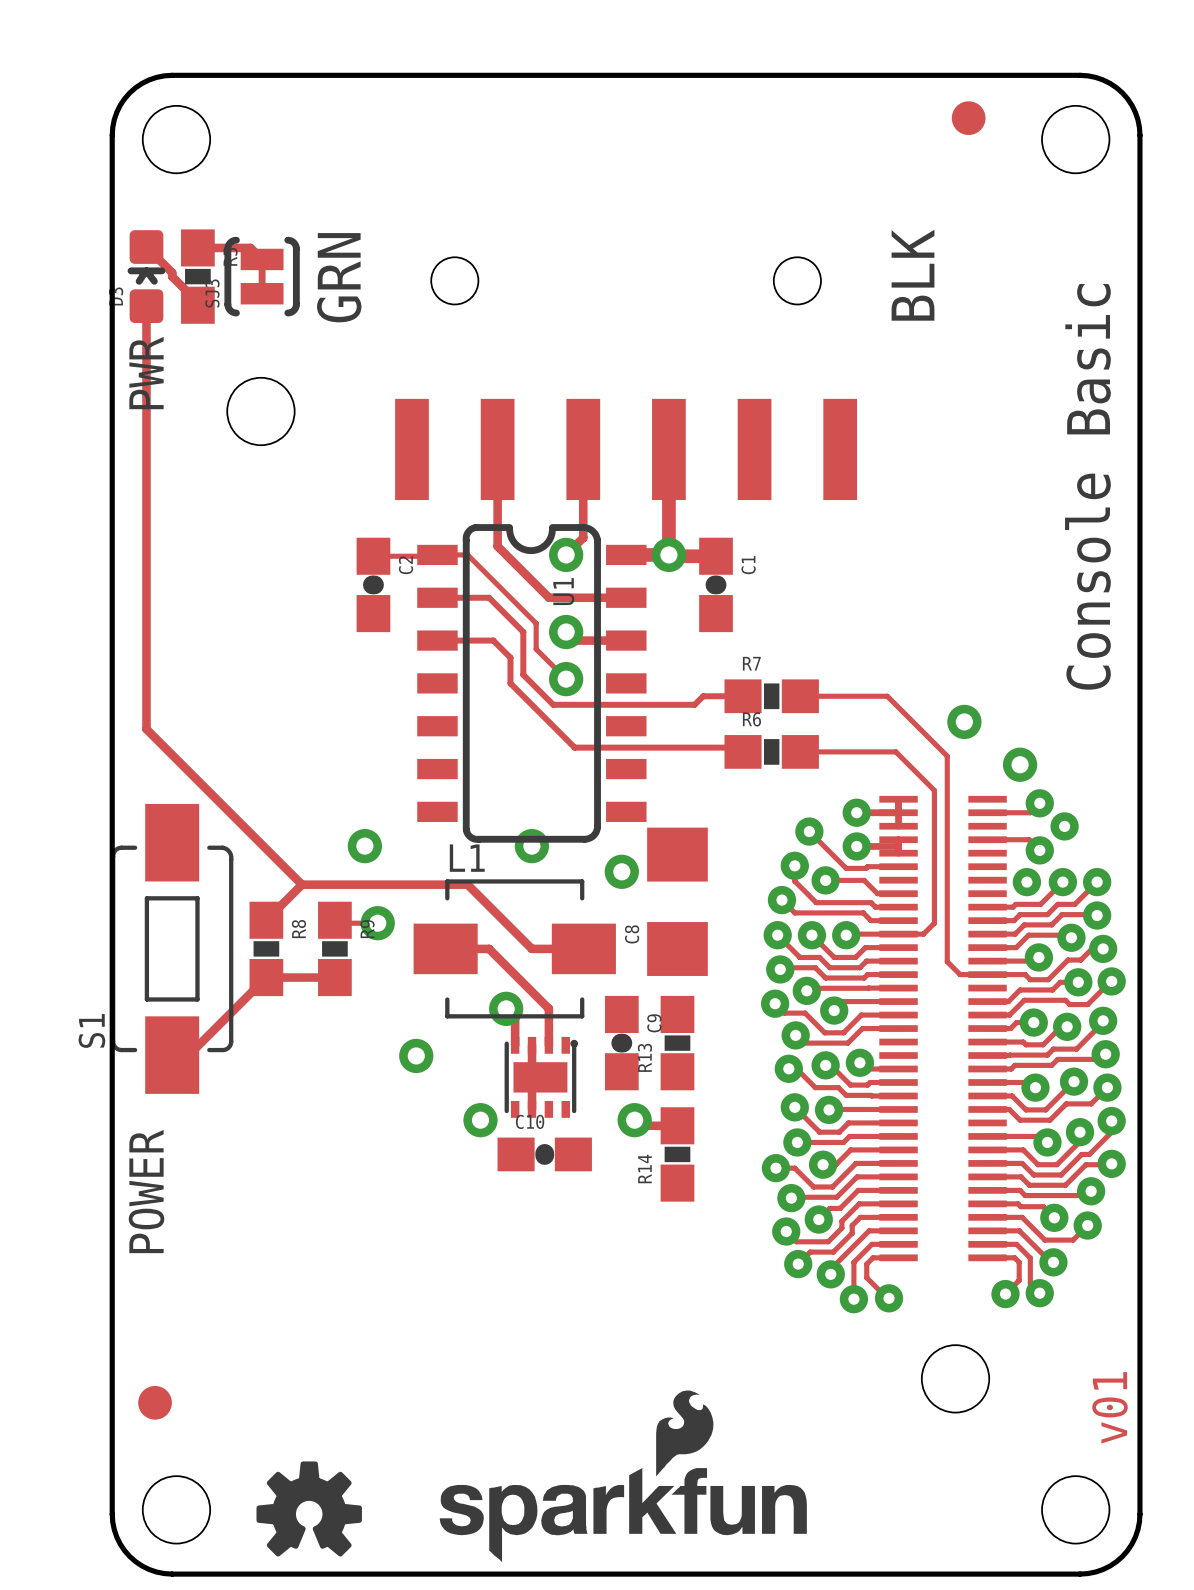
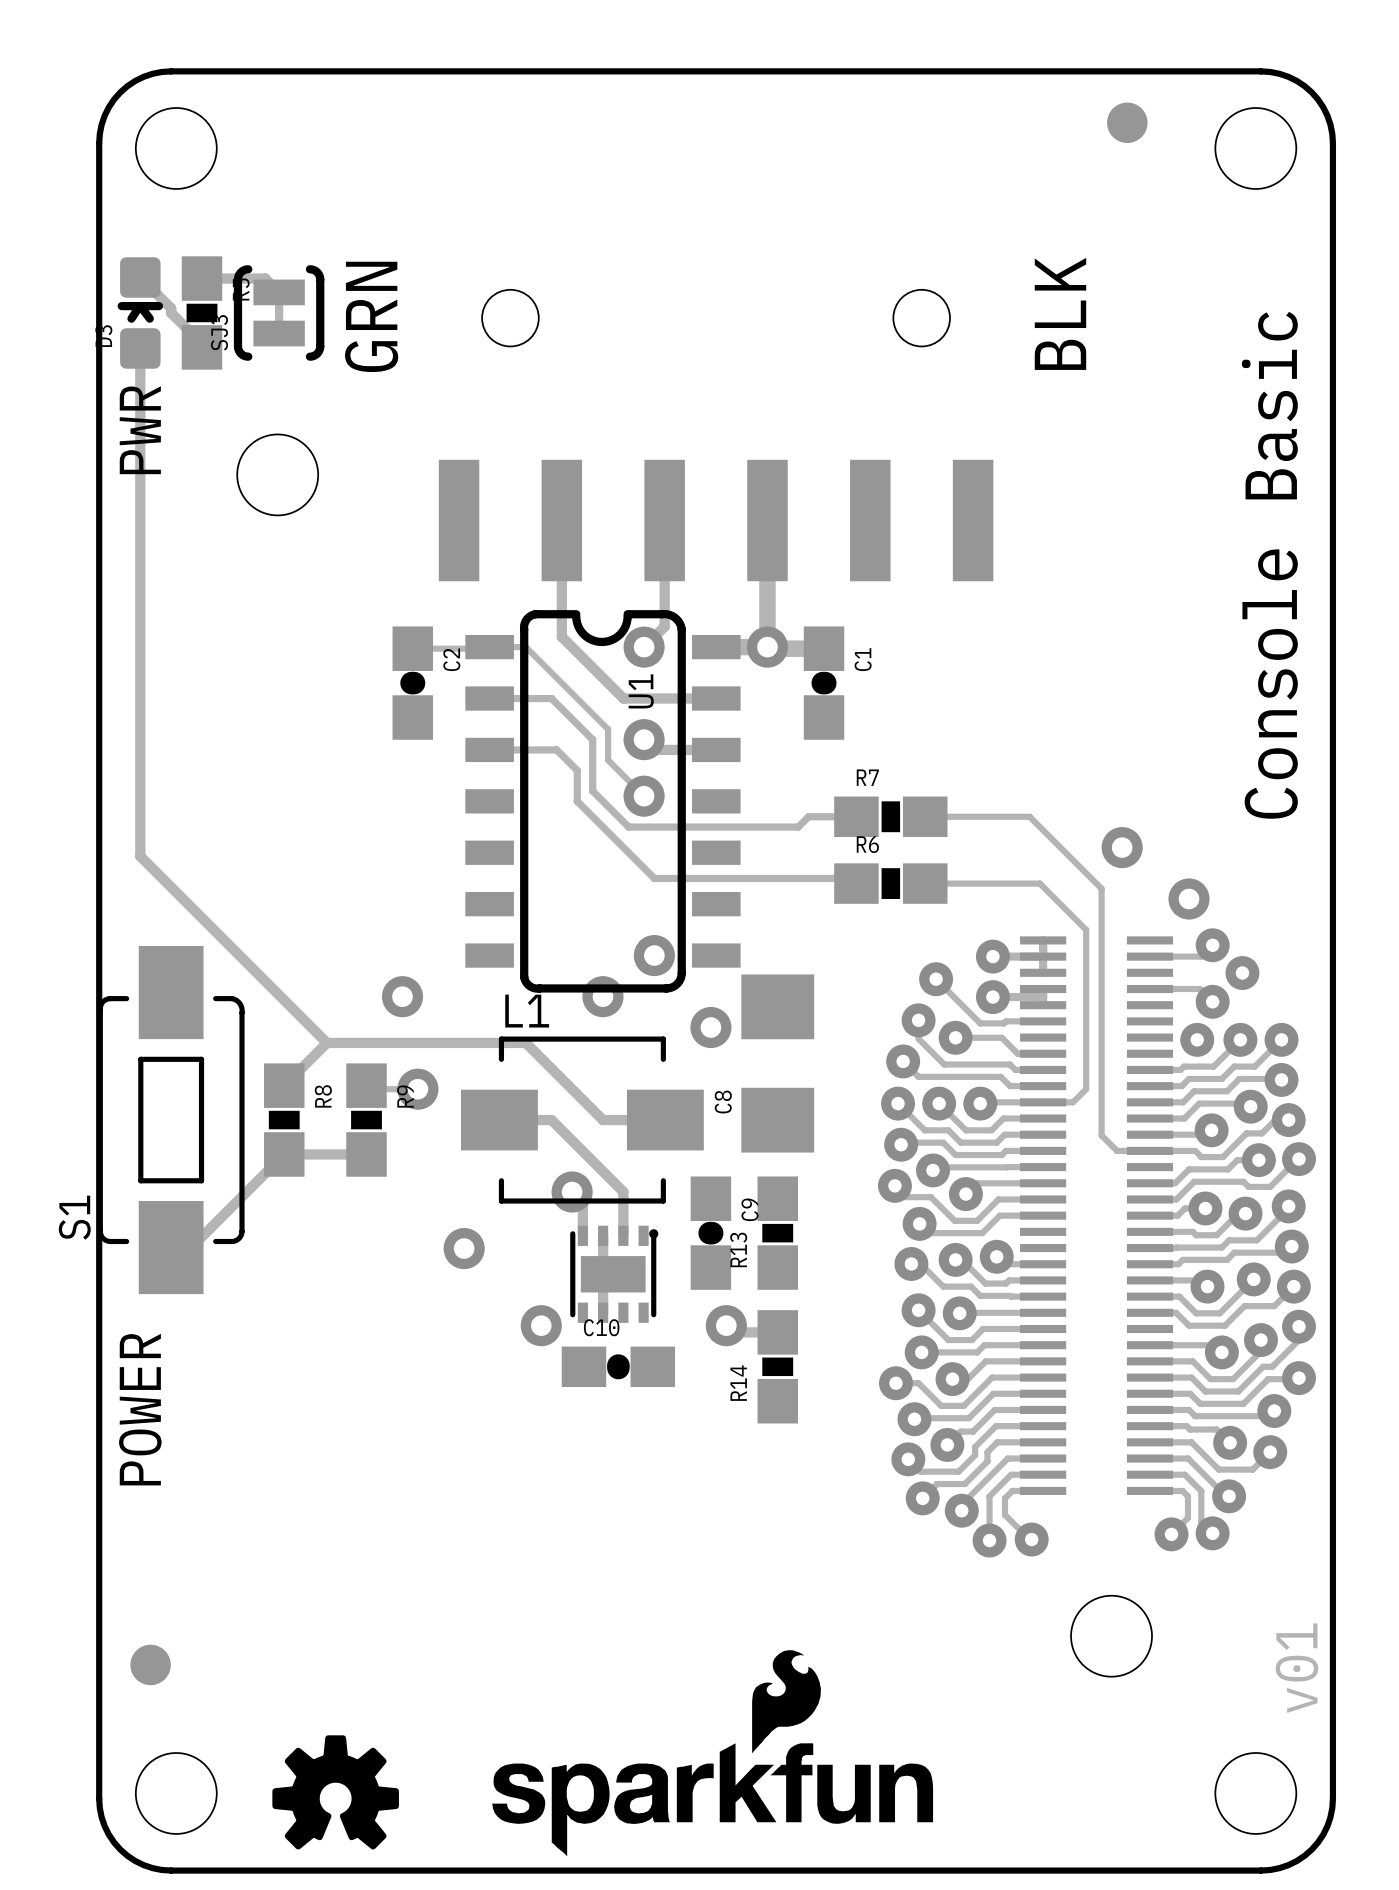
via: none -> (654, 955)

